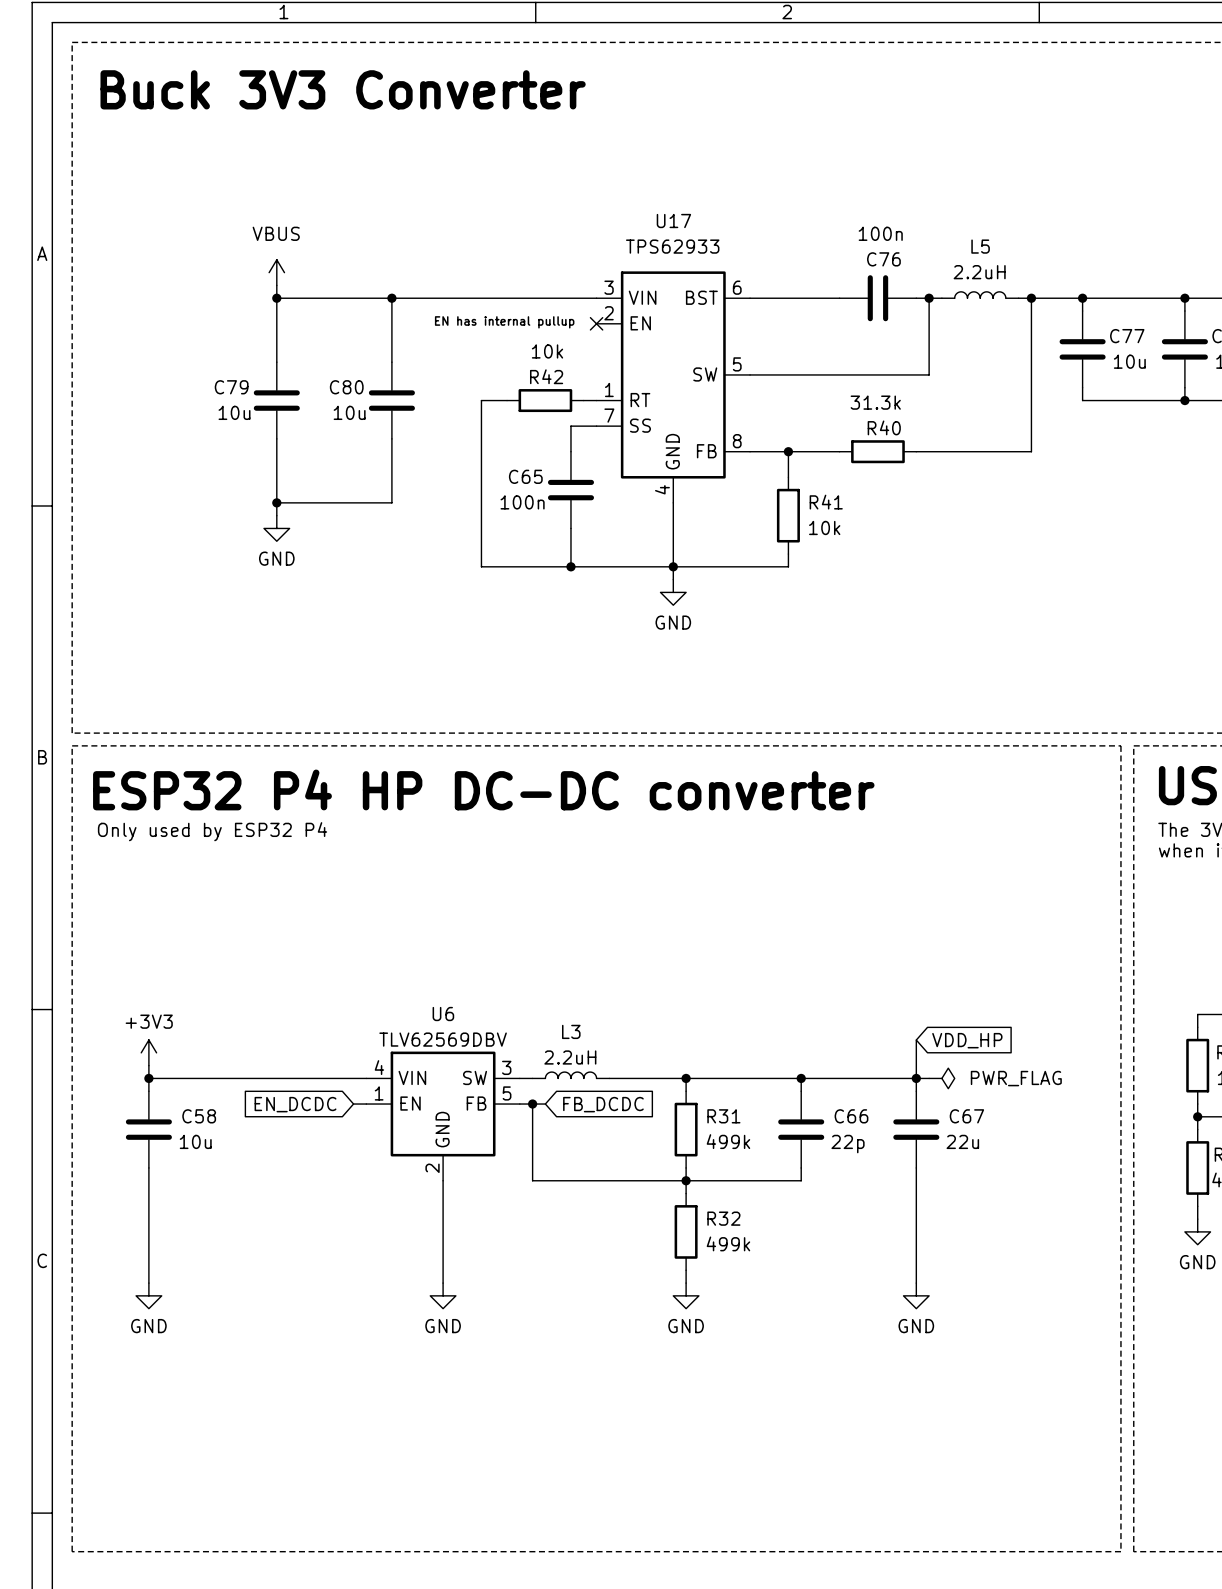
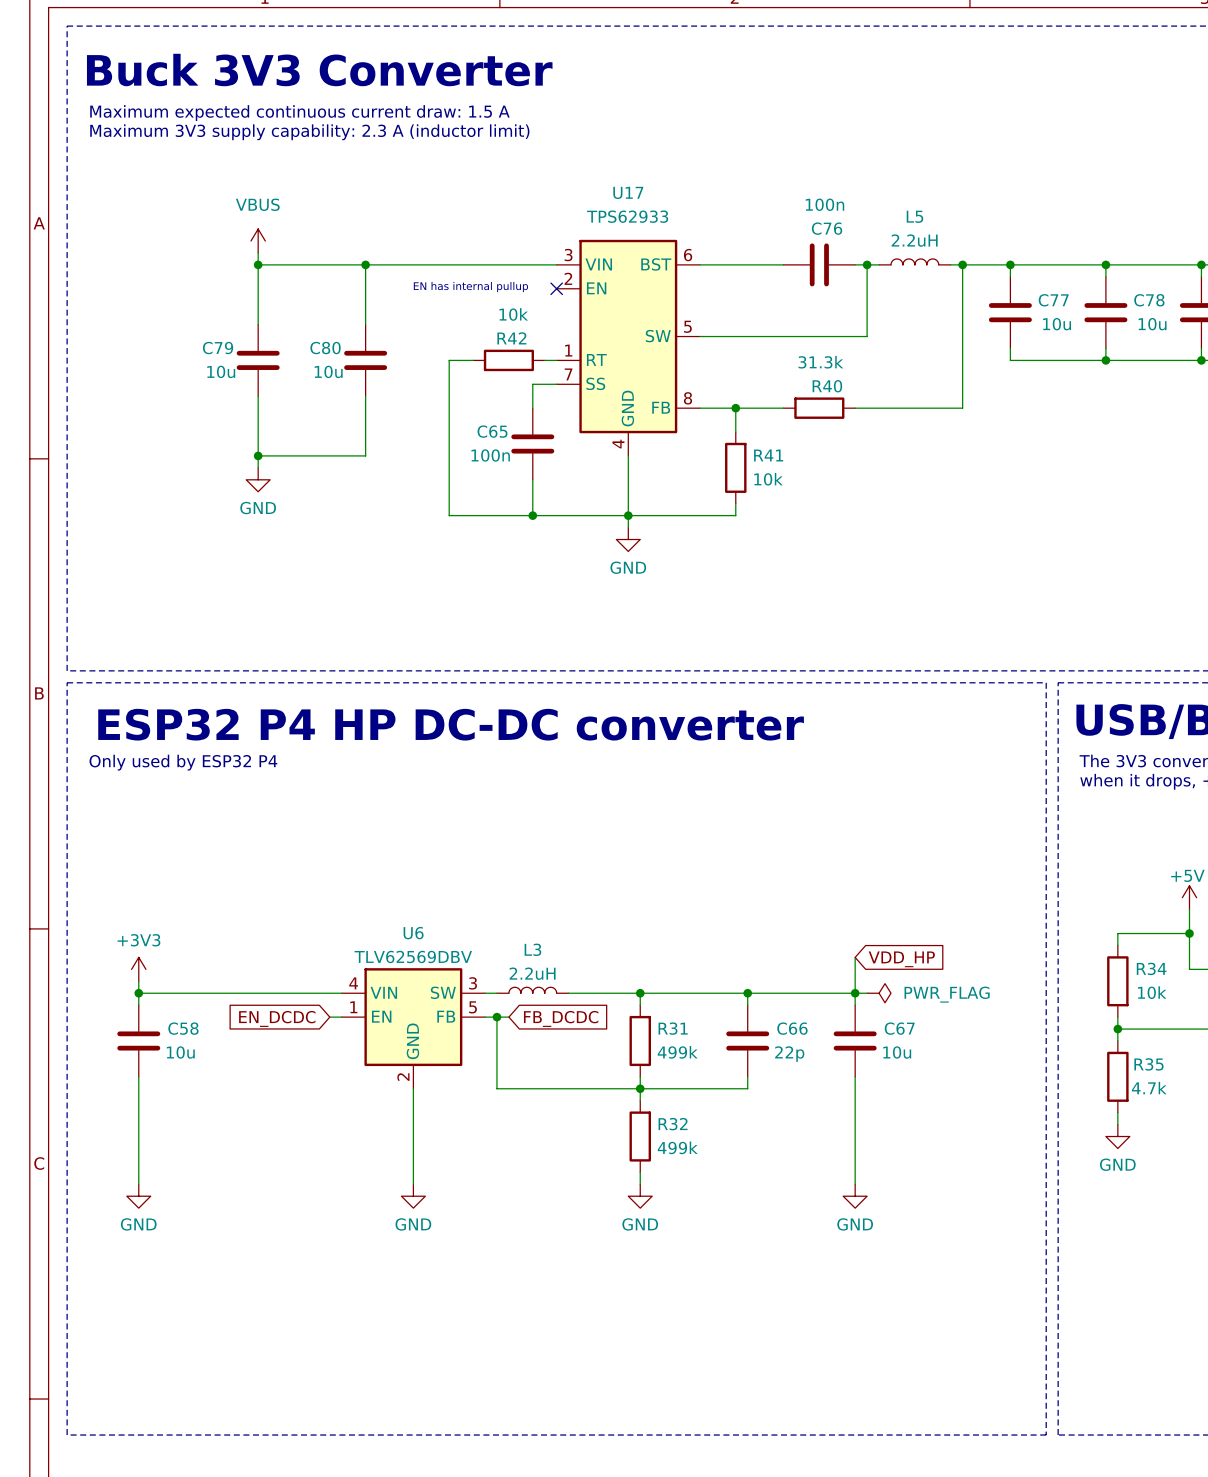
text: none -> Maximum expected continuous current draw: 1.5 A (299, 113)
text: none -> Maximum 3V3 supply capability: 2.3 A (inductor limit) (309, 132)
C67 value: 22u (962, 1141) -> 10u (897, 1052)

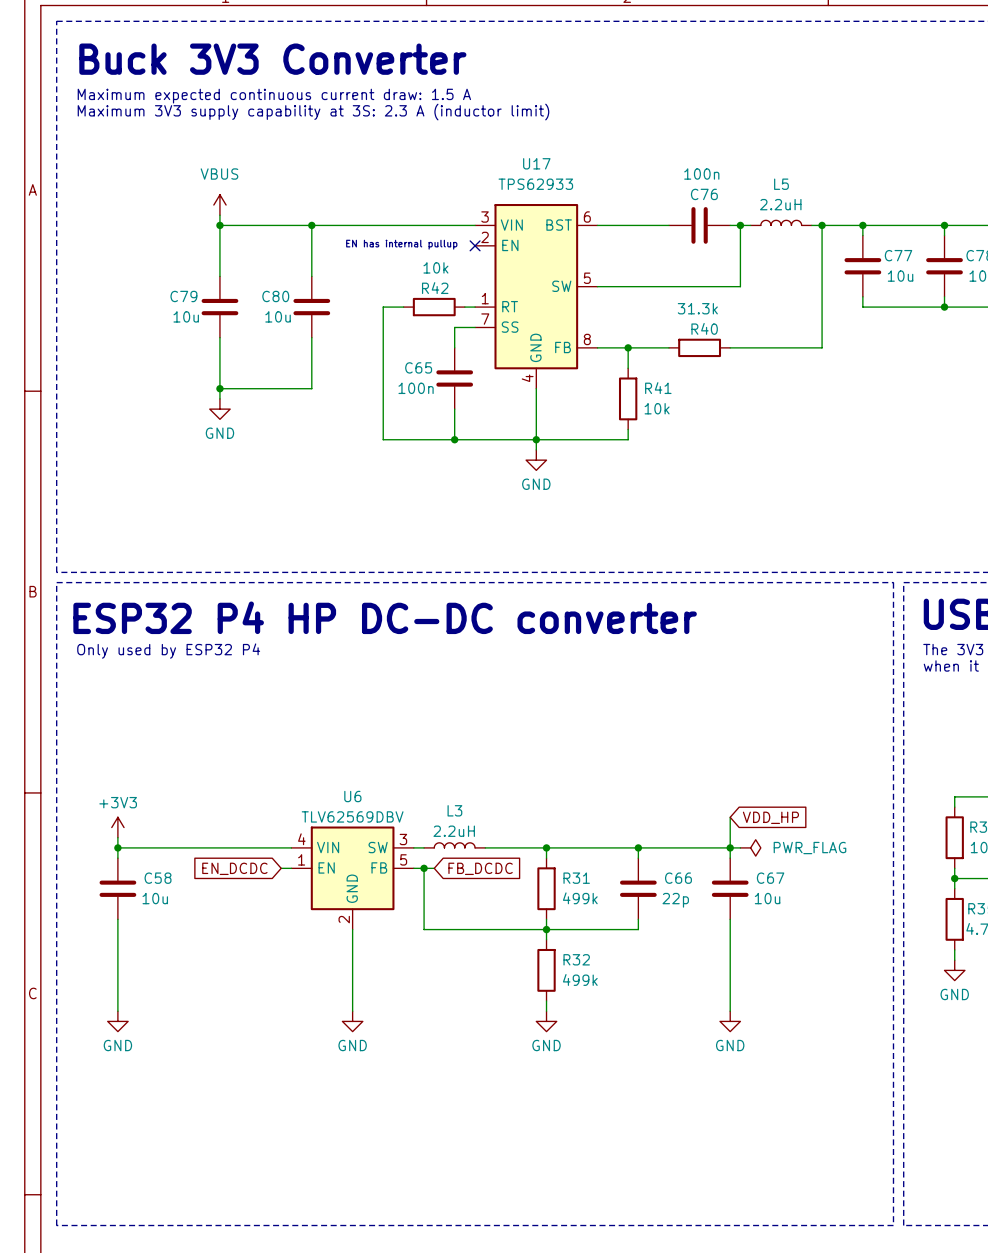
text: Maximum 3V3 supply capability: 2.3 A (inductor limit) (309, 132) -> Maximum 3V3 supply capability at 3S: 2.3 A (inductor limit) (313, 112)

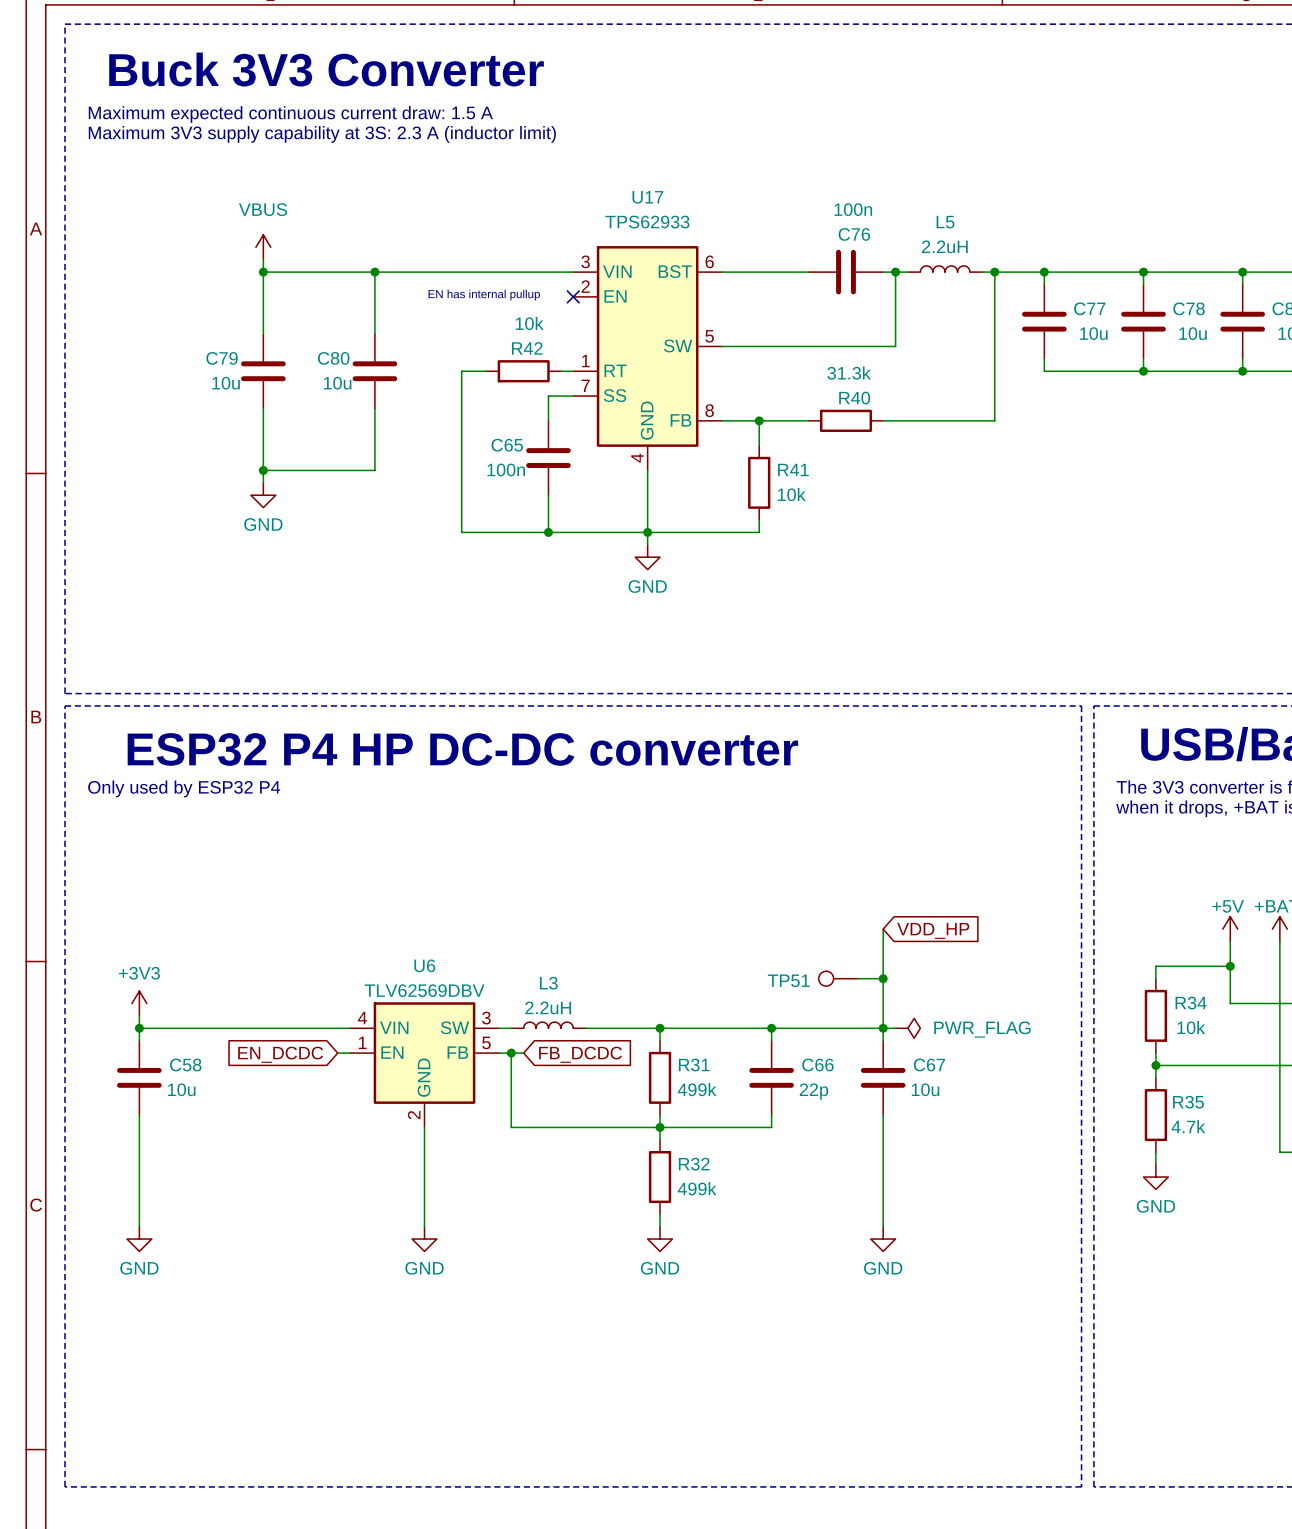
wire: none -> (883, 929) (883, 991)
TP51: none -> (838, 978)
wire: none -> (858, 978) (883, 978)
junction: none -> (883, 978)
global label position: VDD_HP (770, 817) -> VDD_HP (933, 930)

